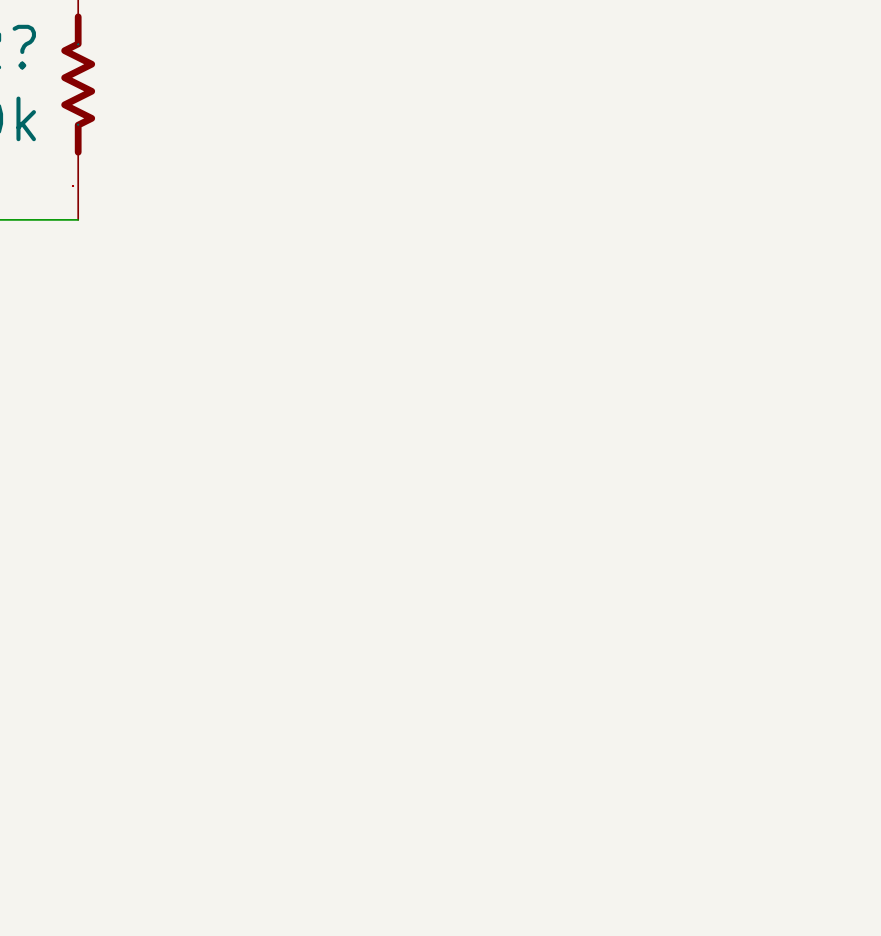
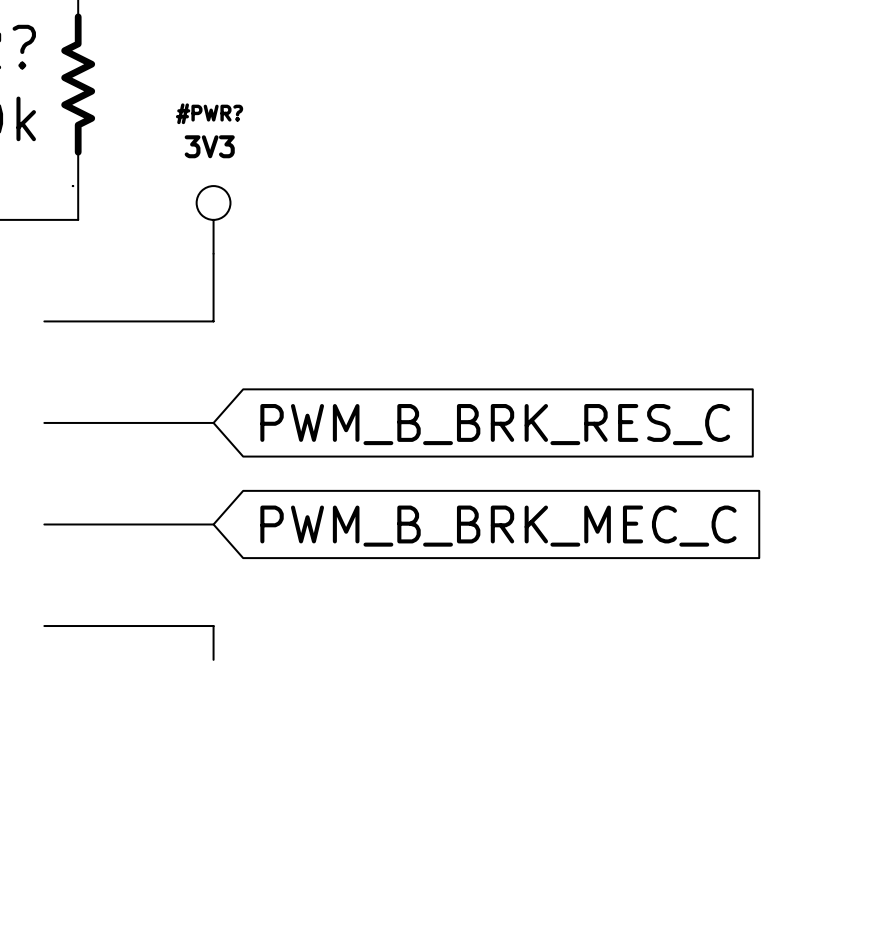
#PWR?: none -> 3V3 (213, 219)
wire: none -> (213, 253) (213, 321) (44, 321)
wire: none -> (44, 422) (213, 422)
global label: none -> PWM_B_BRK_RES_C (495, 424)
wire: none -> (44, 524) (213, 524)
global label: none -> PWM_B_BRK_MEC_C (498, 526)
wire: none -> (44, 626) (213, 626) (213, 659)

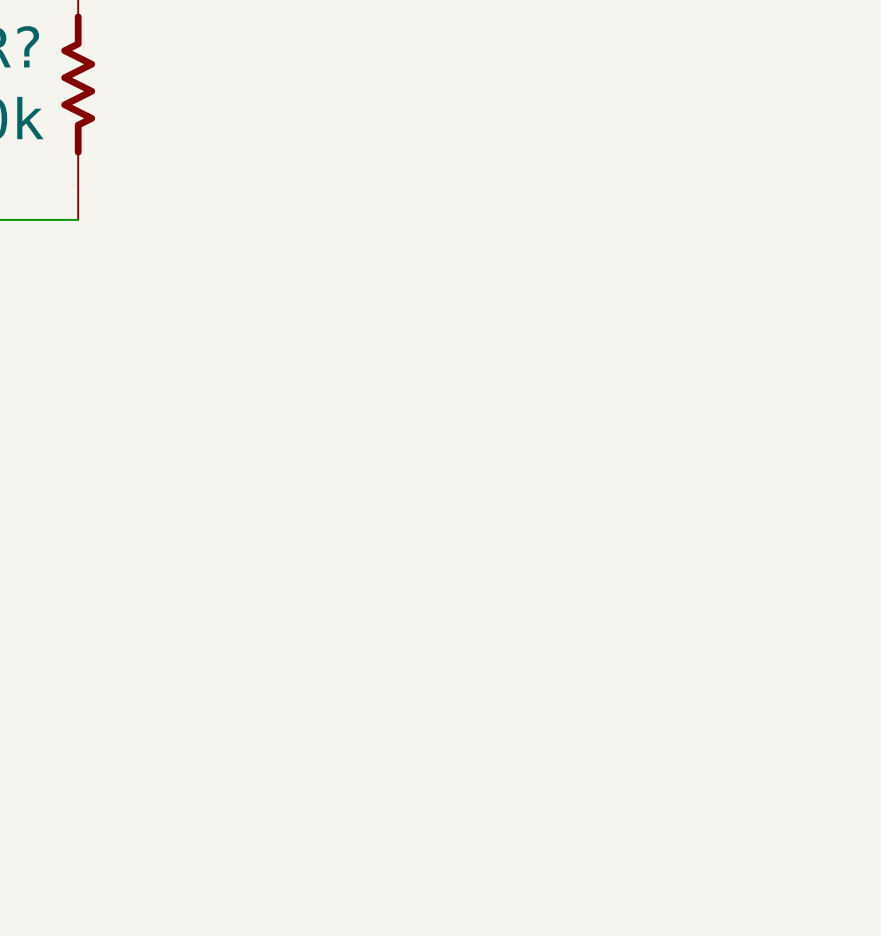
#PWR?: 3V3 (213, 219) -> none
wire: (213, 253) (213, 321) (44, 321) -> none
wire: (44, 422) (213, 422) -> none
global label: PWM_B_BRK_RES_C (495, 424) -> none
wire: (44, 524) (213, 524) -> none
global label: PWM_B_BRK_MEC_C (498, 526) -> none
wire: (44, 626) (213, 626) (213, 659) -> none

